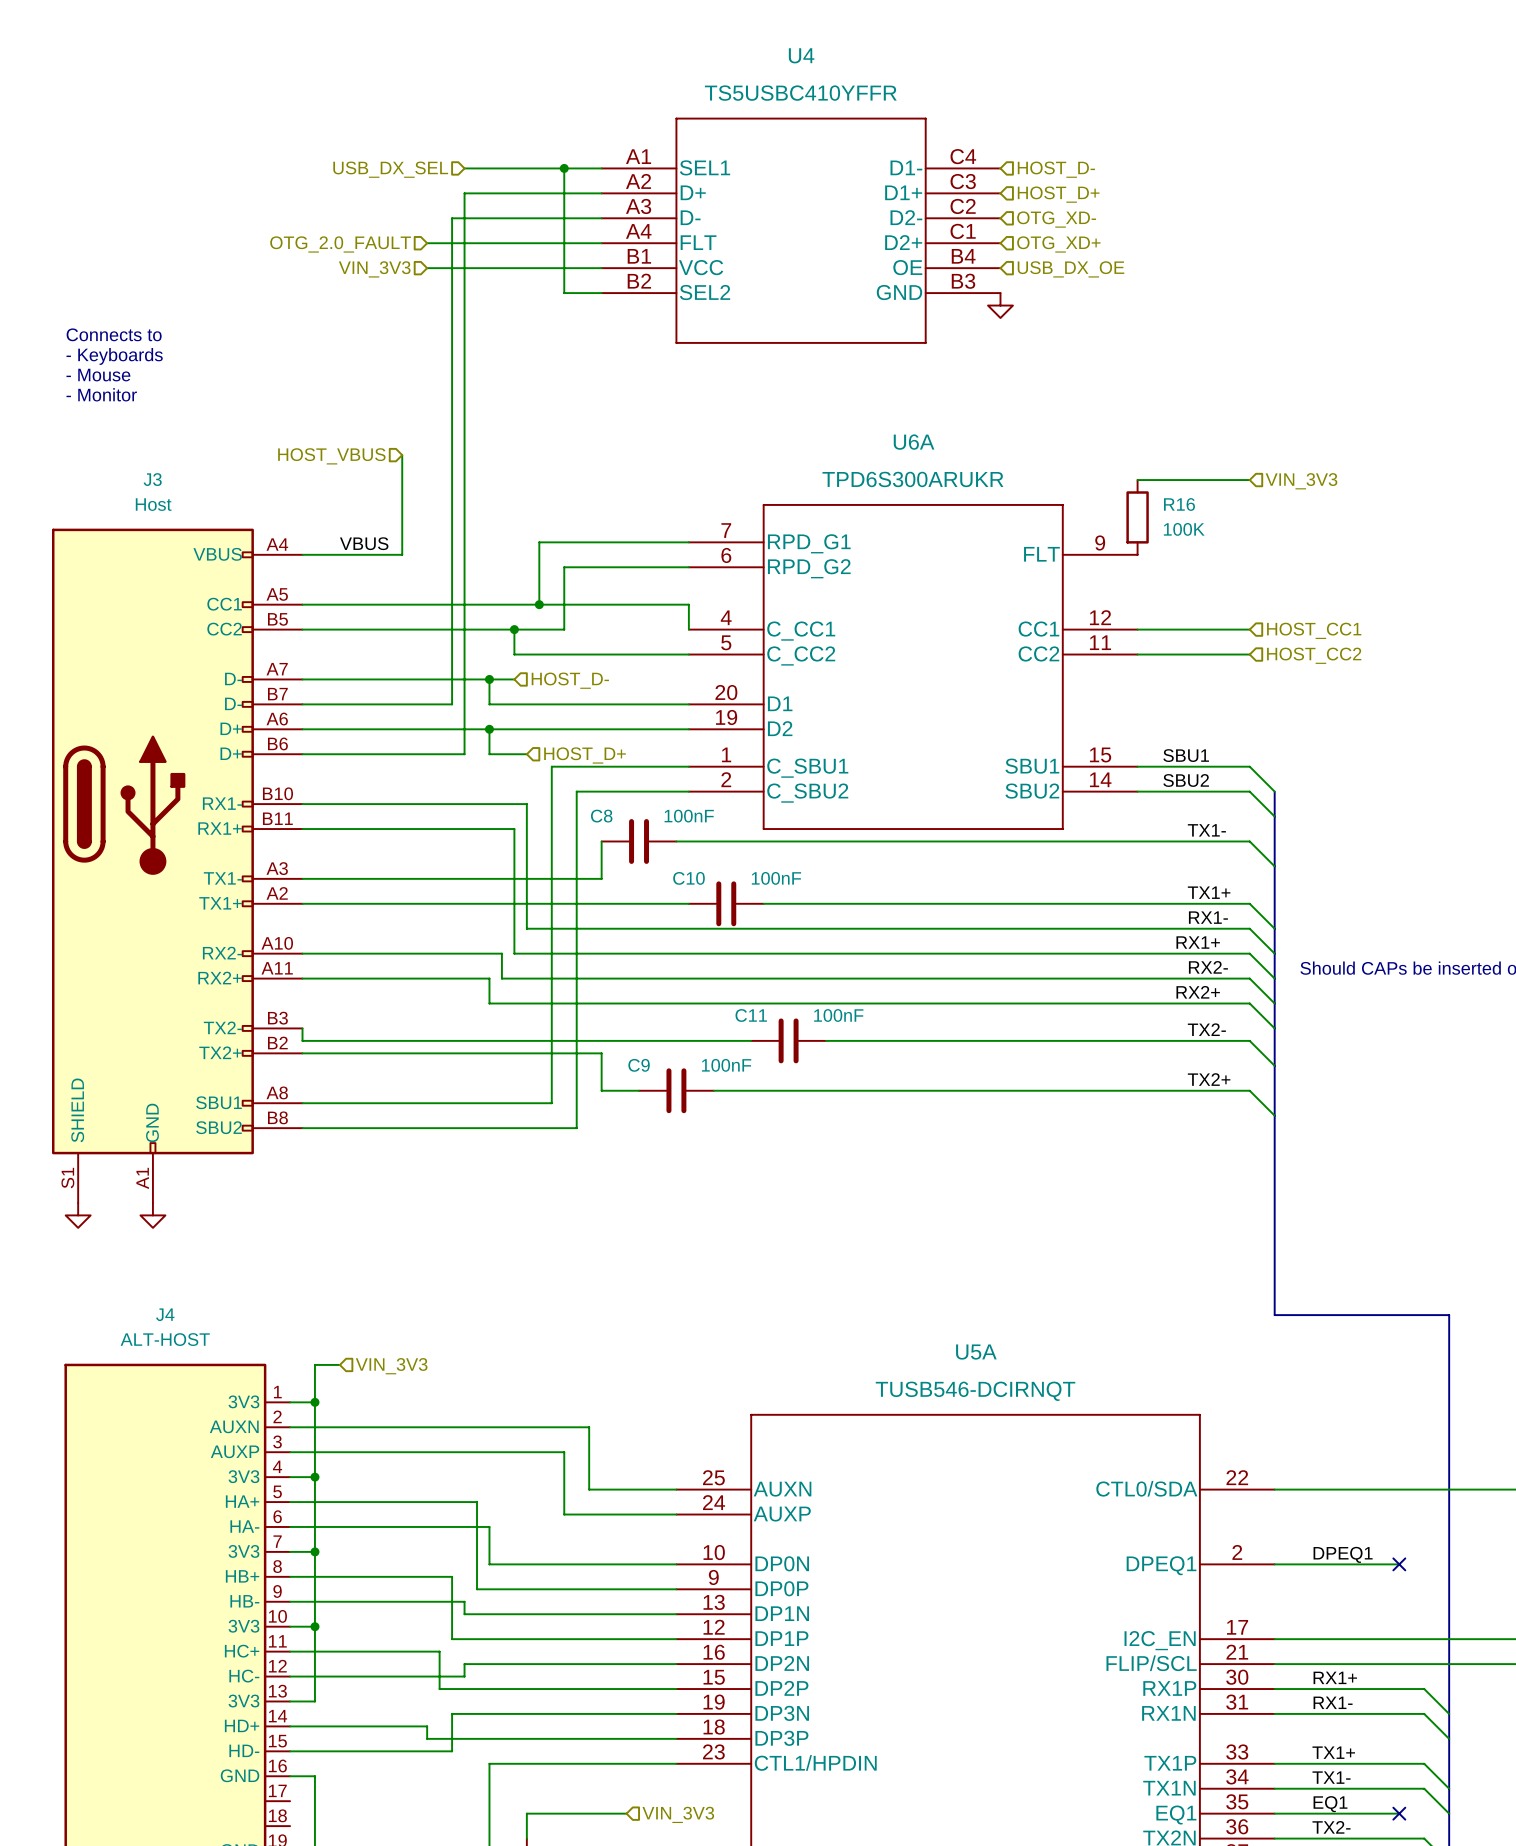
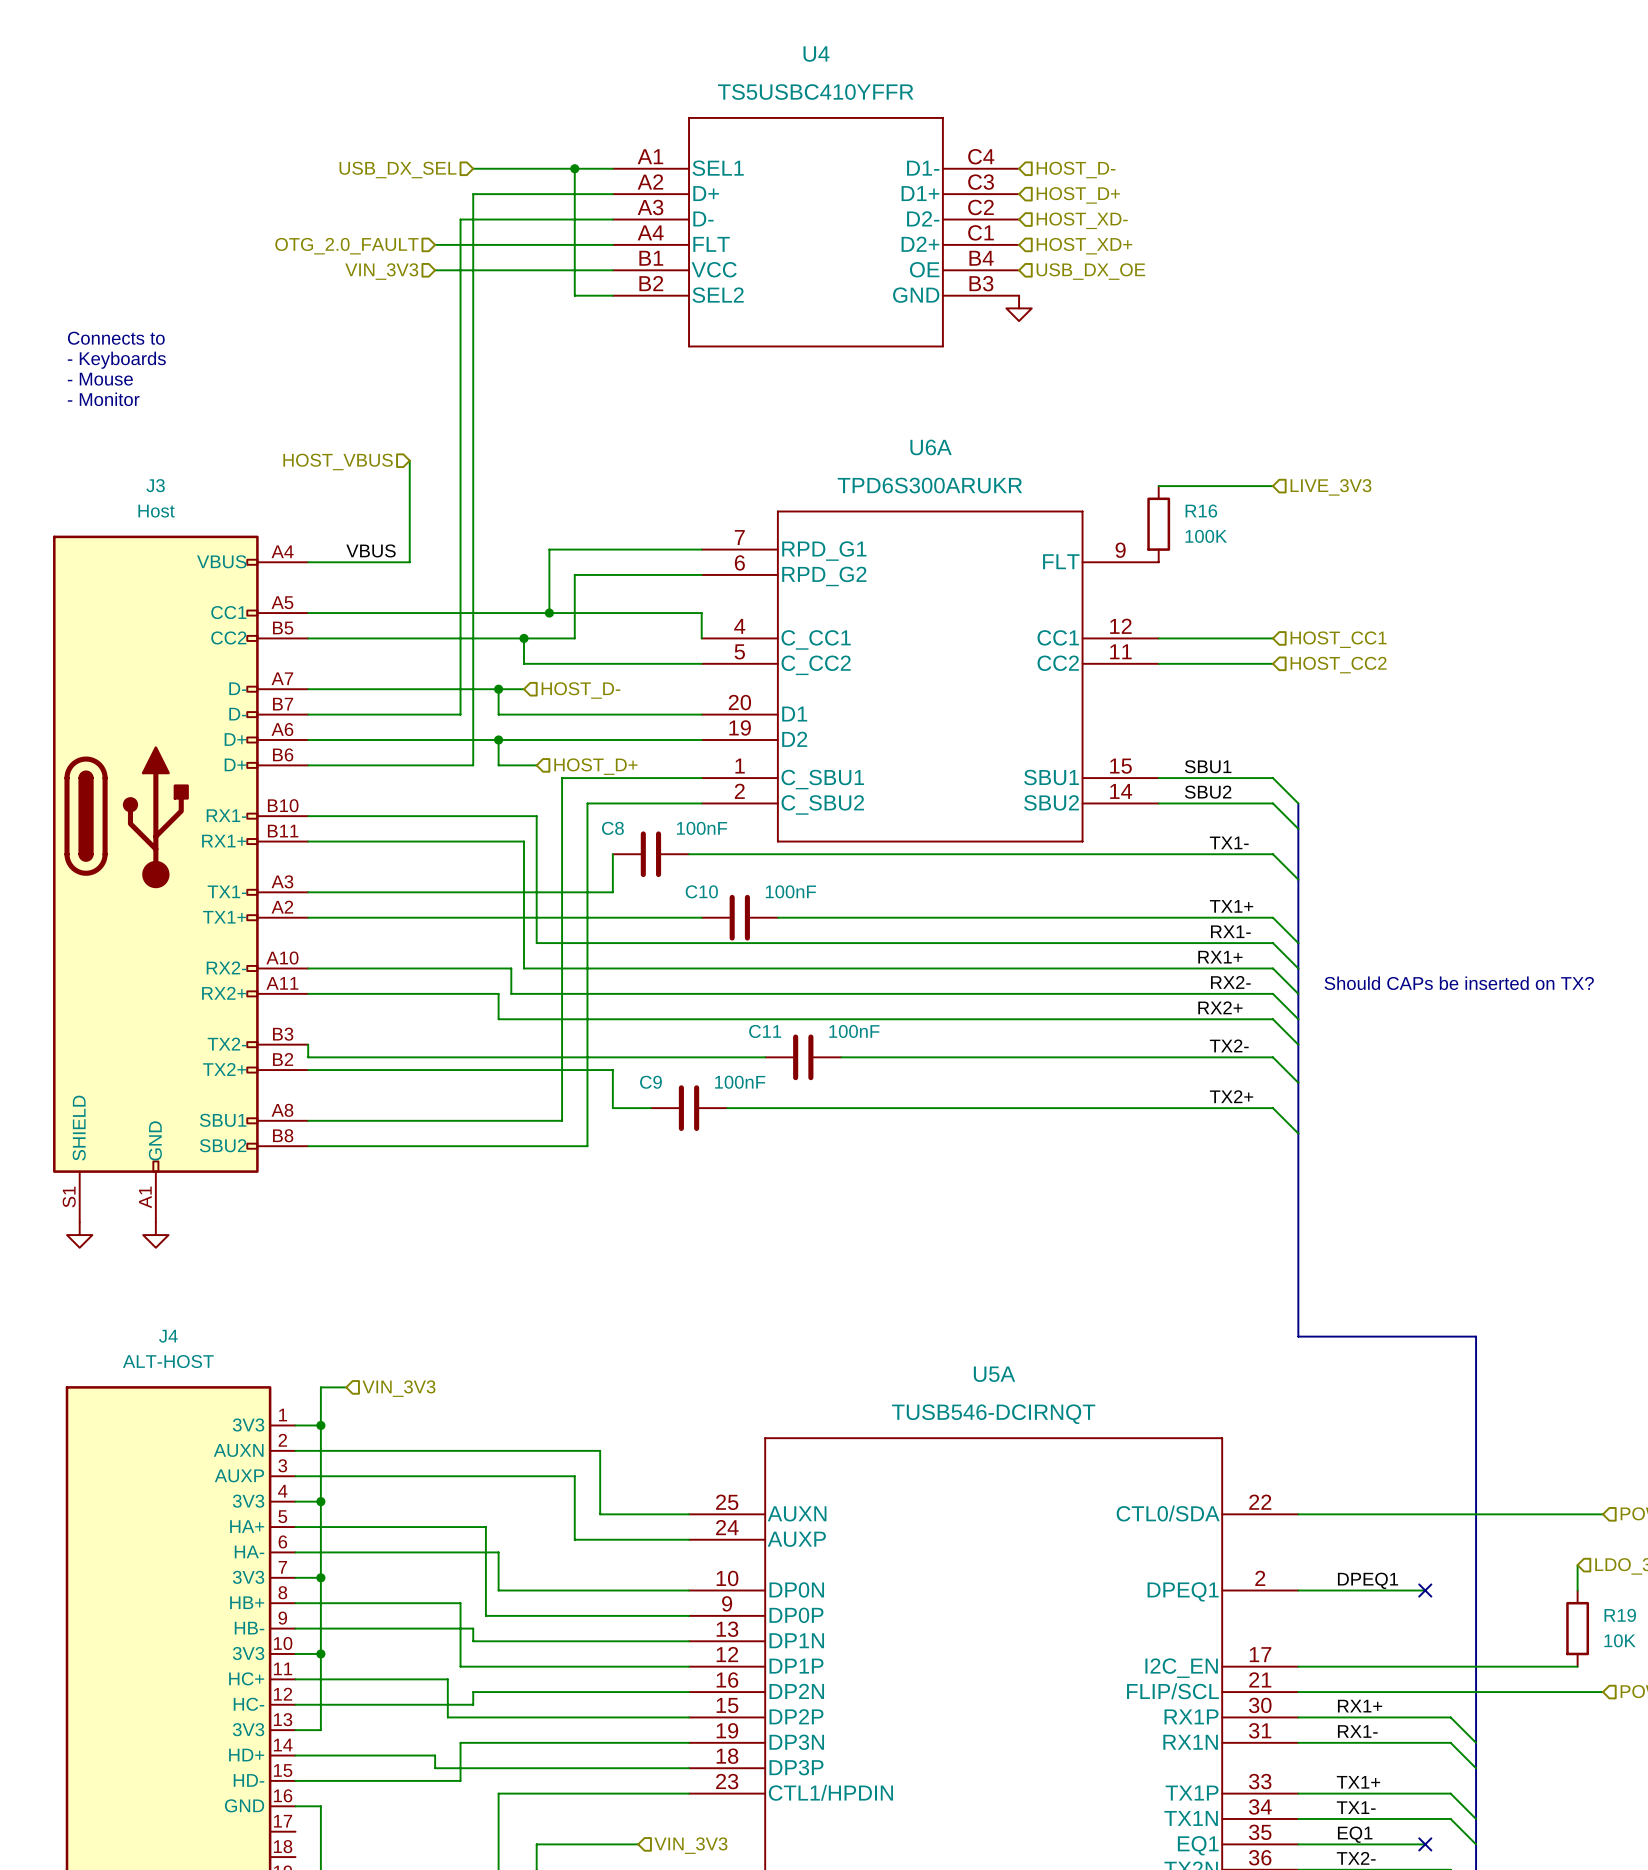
hierarchical label: OTG_XD- (1056, 219) -> HOST_XD- (1082, 220)
hierarchical label: OTG_XD+ (1058, 244) -> HOST_XD+ (1084, 246)
hierarchical label: VIN_3V3 (1301, 481) -> LIVE_3V3 (1330, 487)

